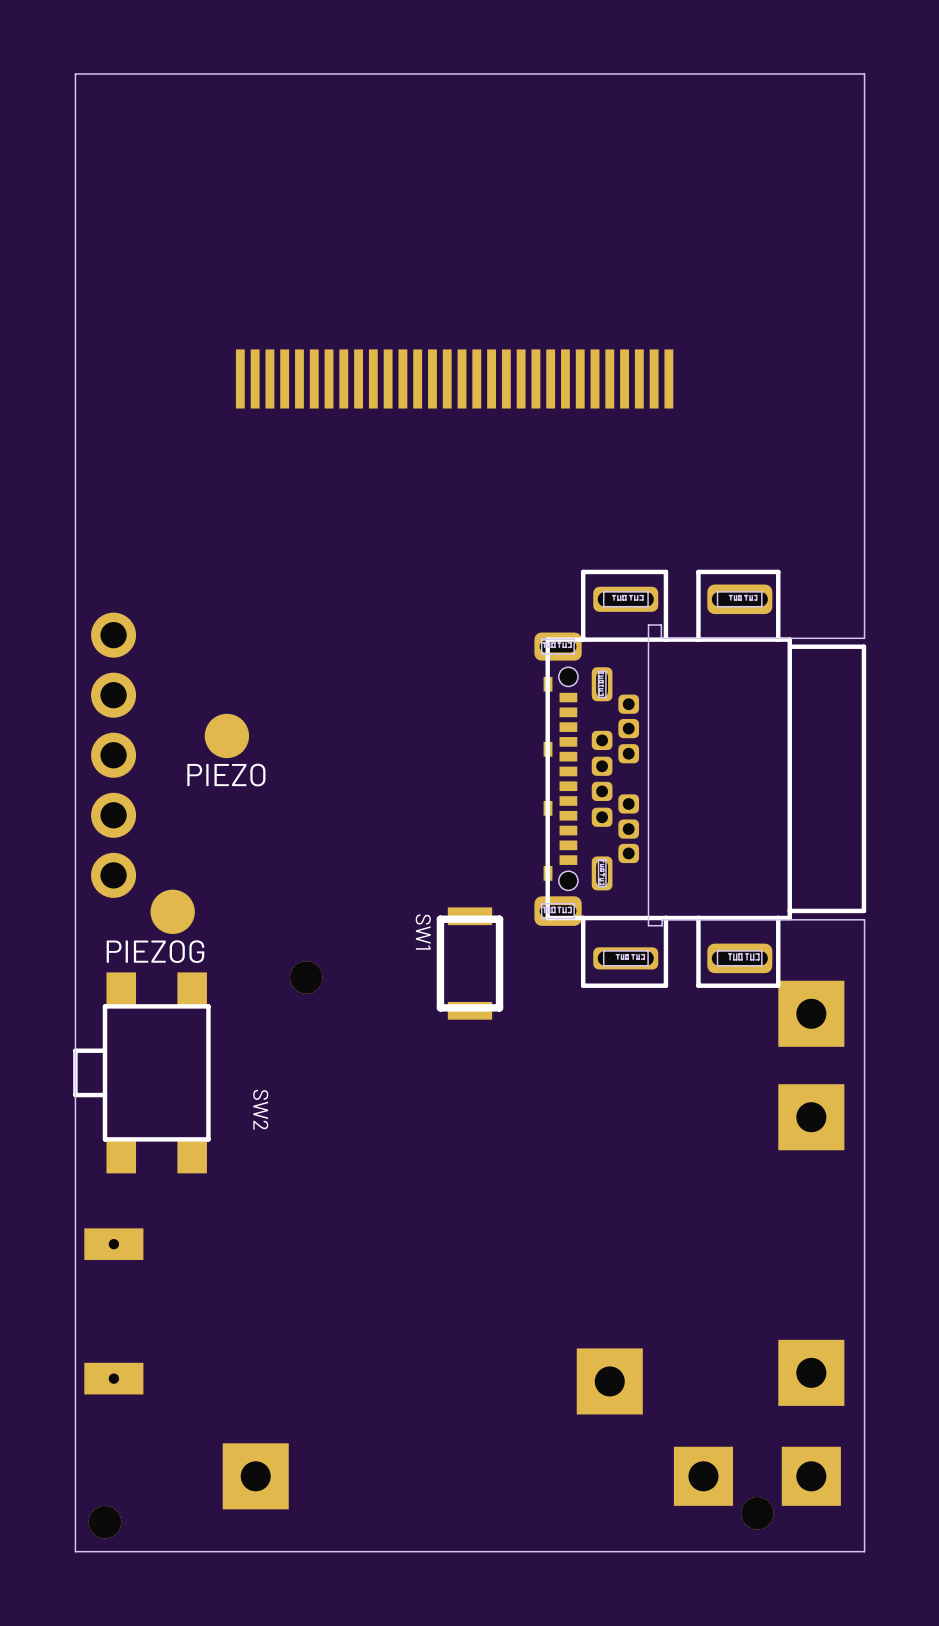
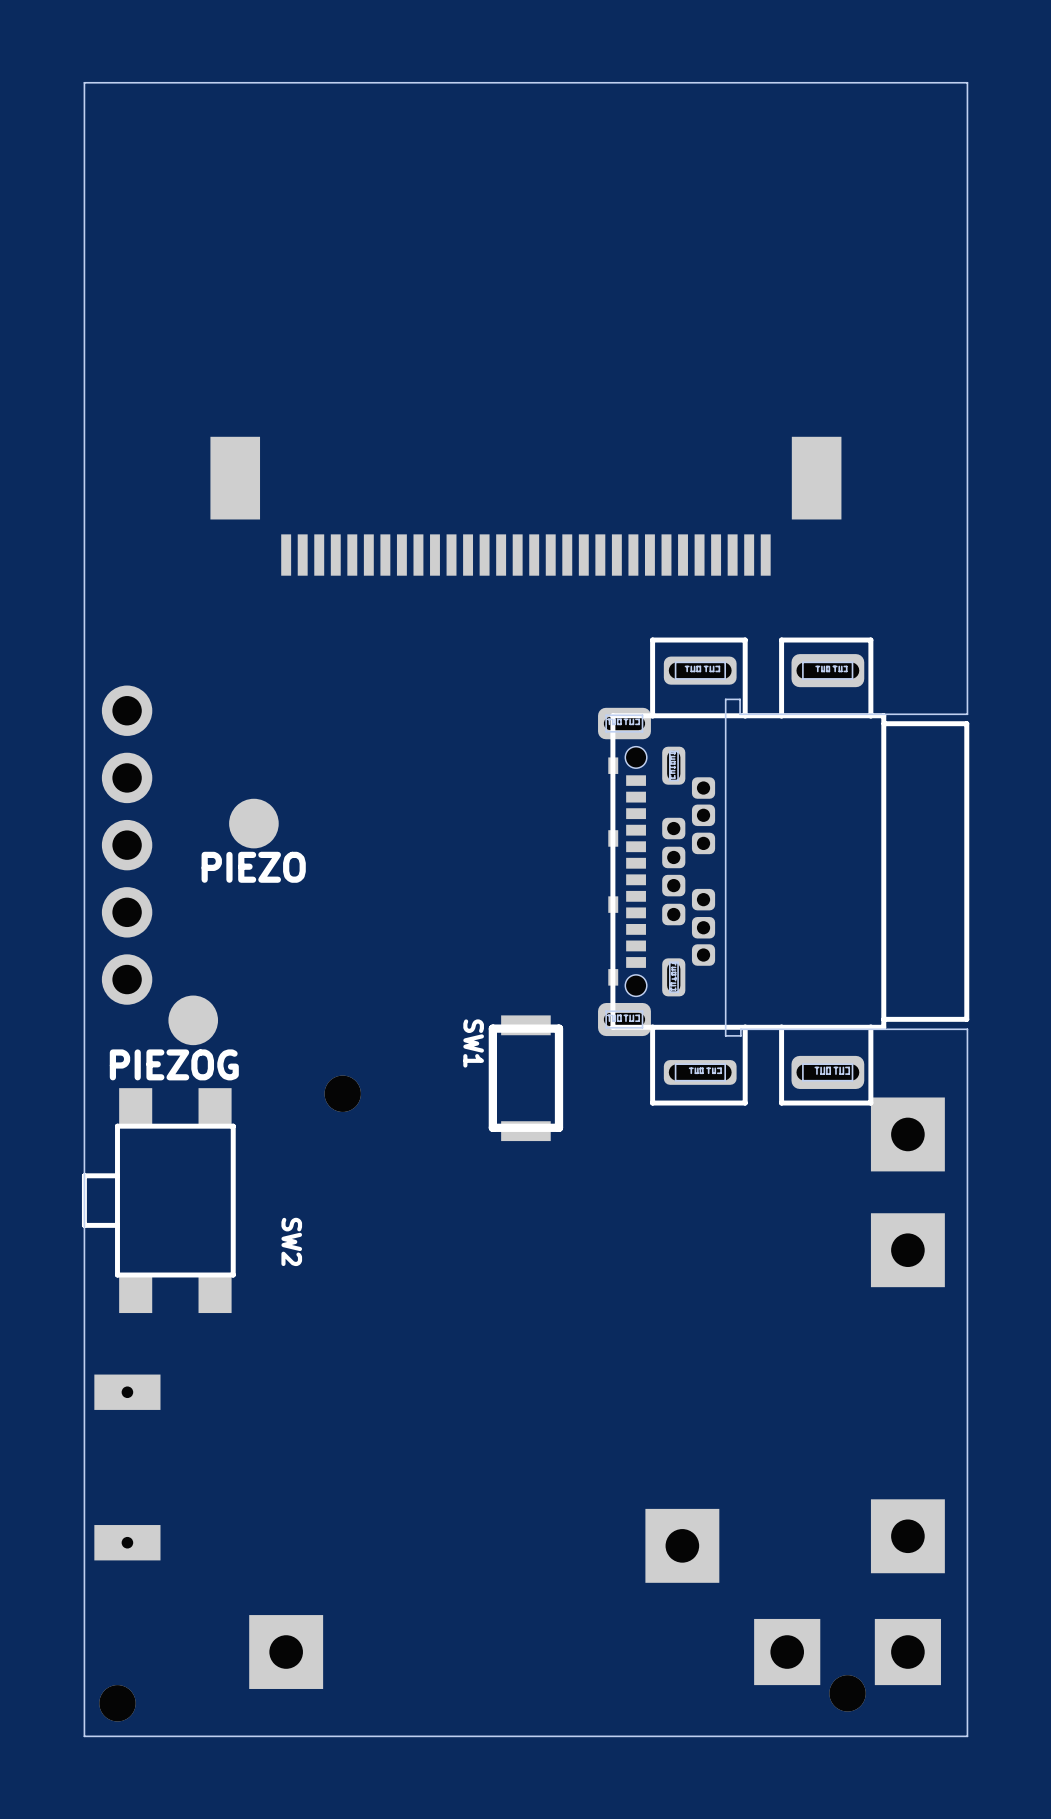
part: (454, 378) -> none
part: none -> (525, 506)

